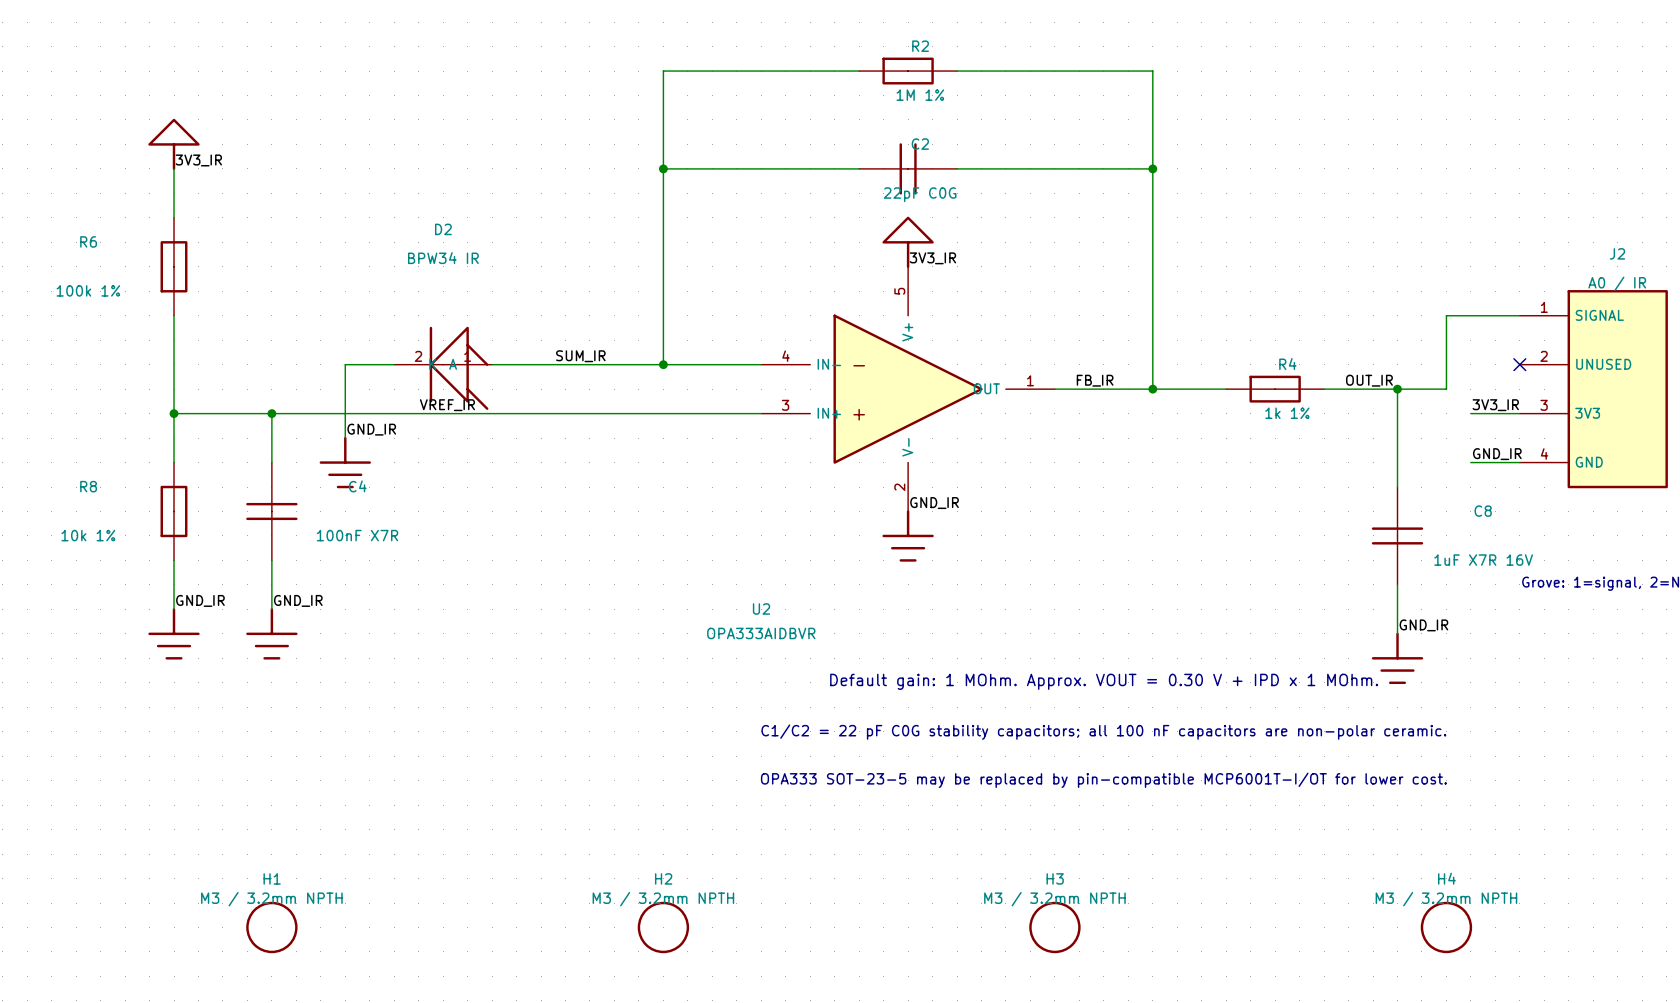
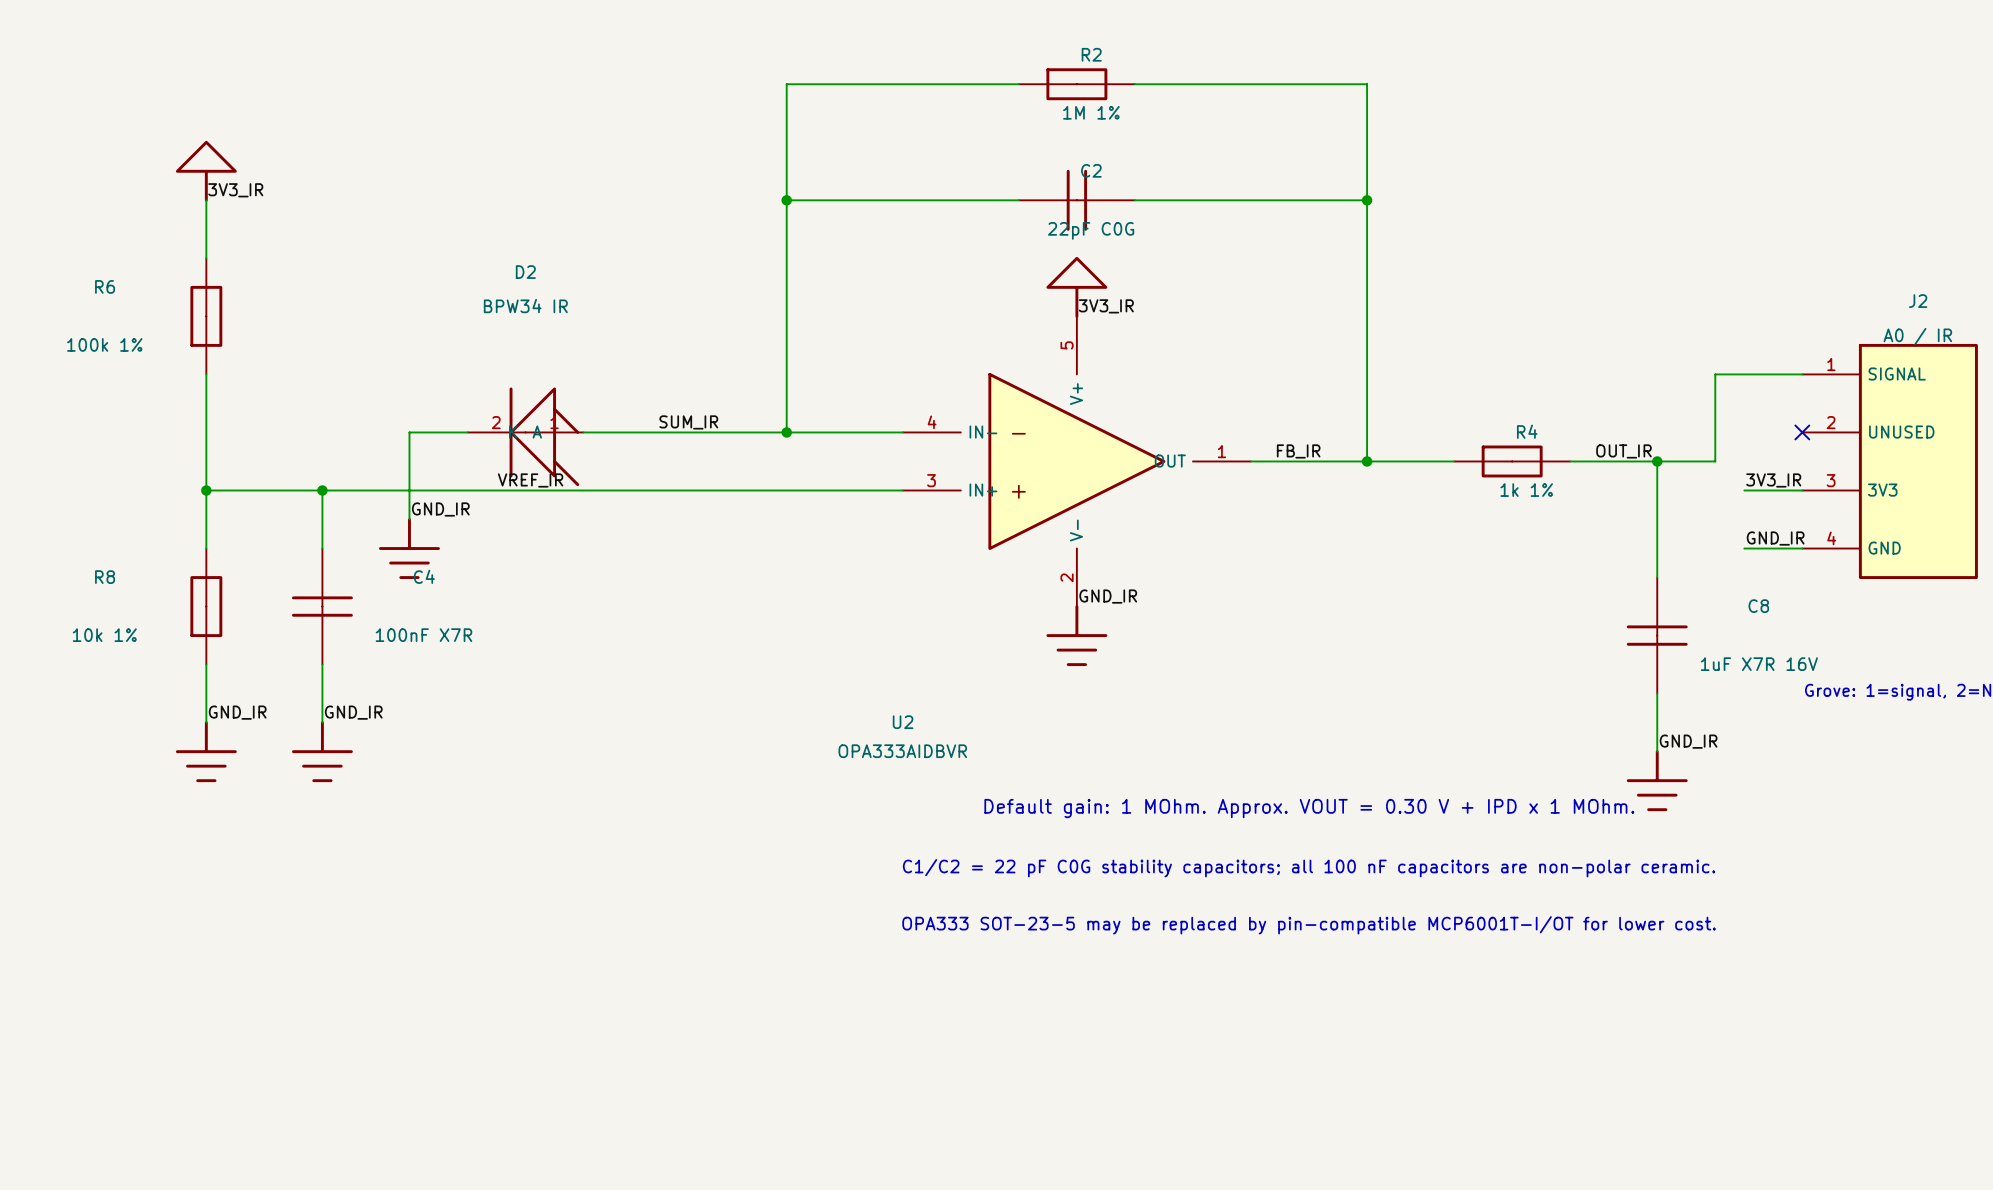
H1: M3 / 3.2mm NPTH (271, 927) -> none
H2: M3 / 3.2mm NPTH (663, 927) -> none
H3: M3 / 3.2mm NPTH (1054, 927) -> none
H4: M3 / 3.2mm NPTH (1446, 927) -> none

